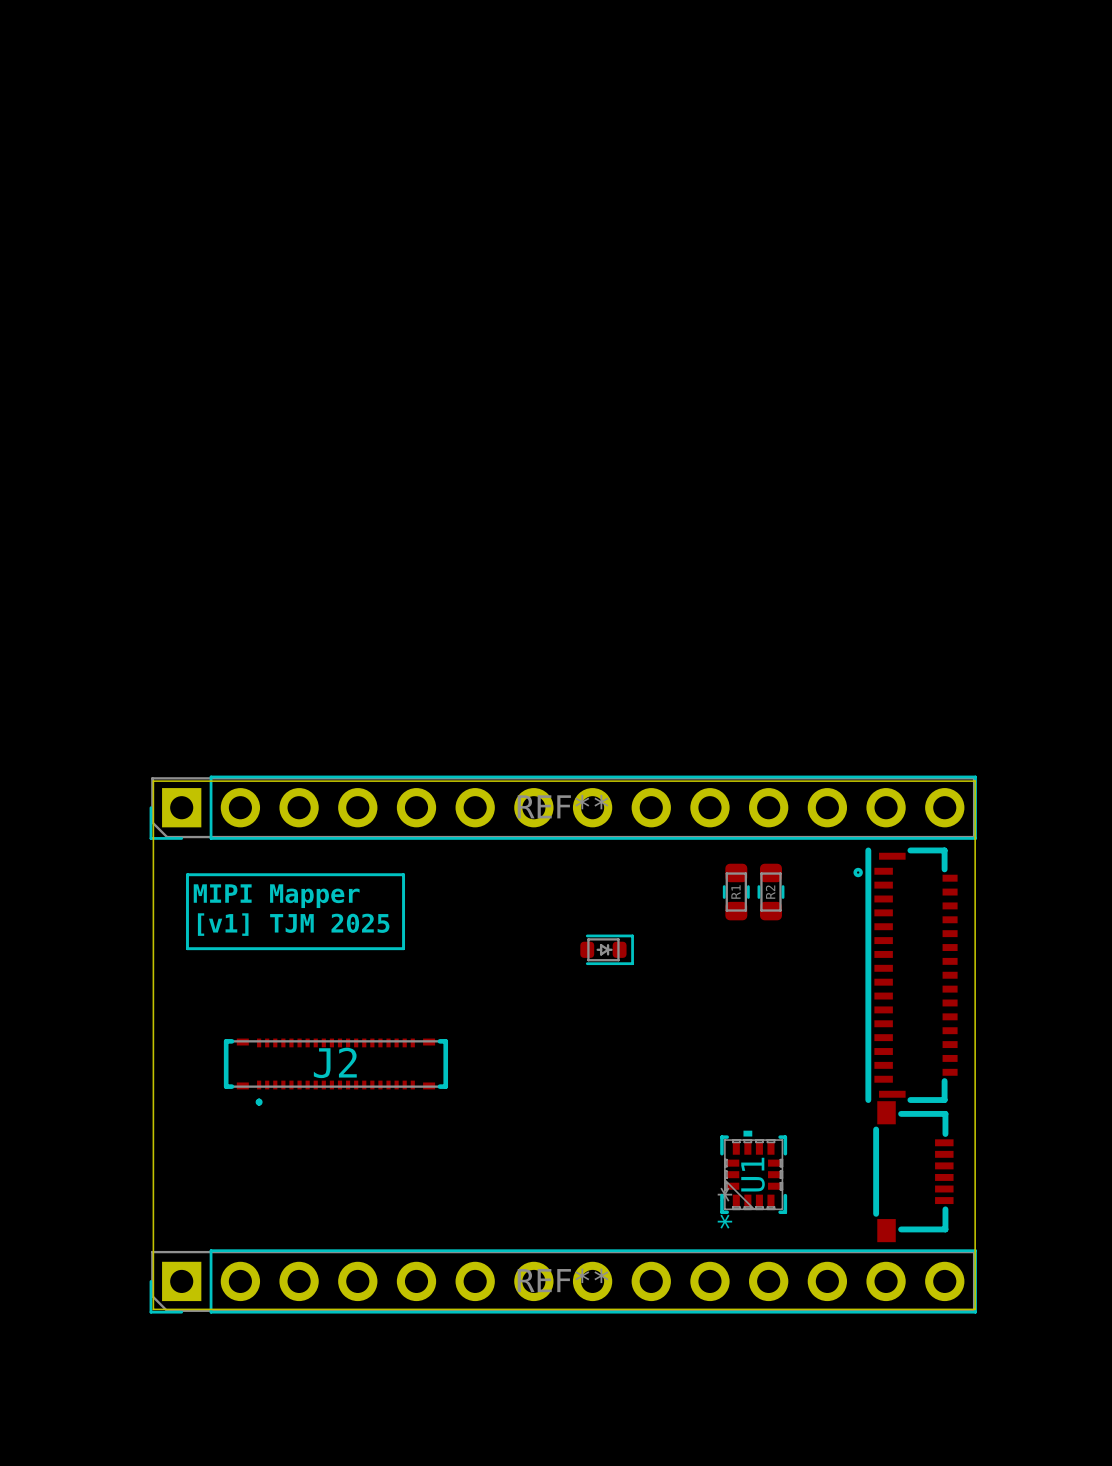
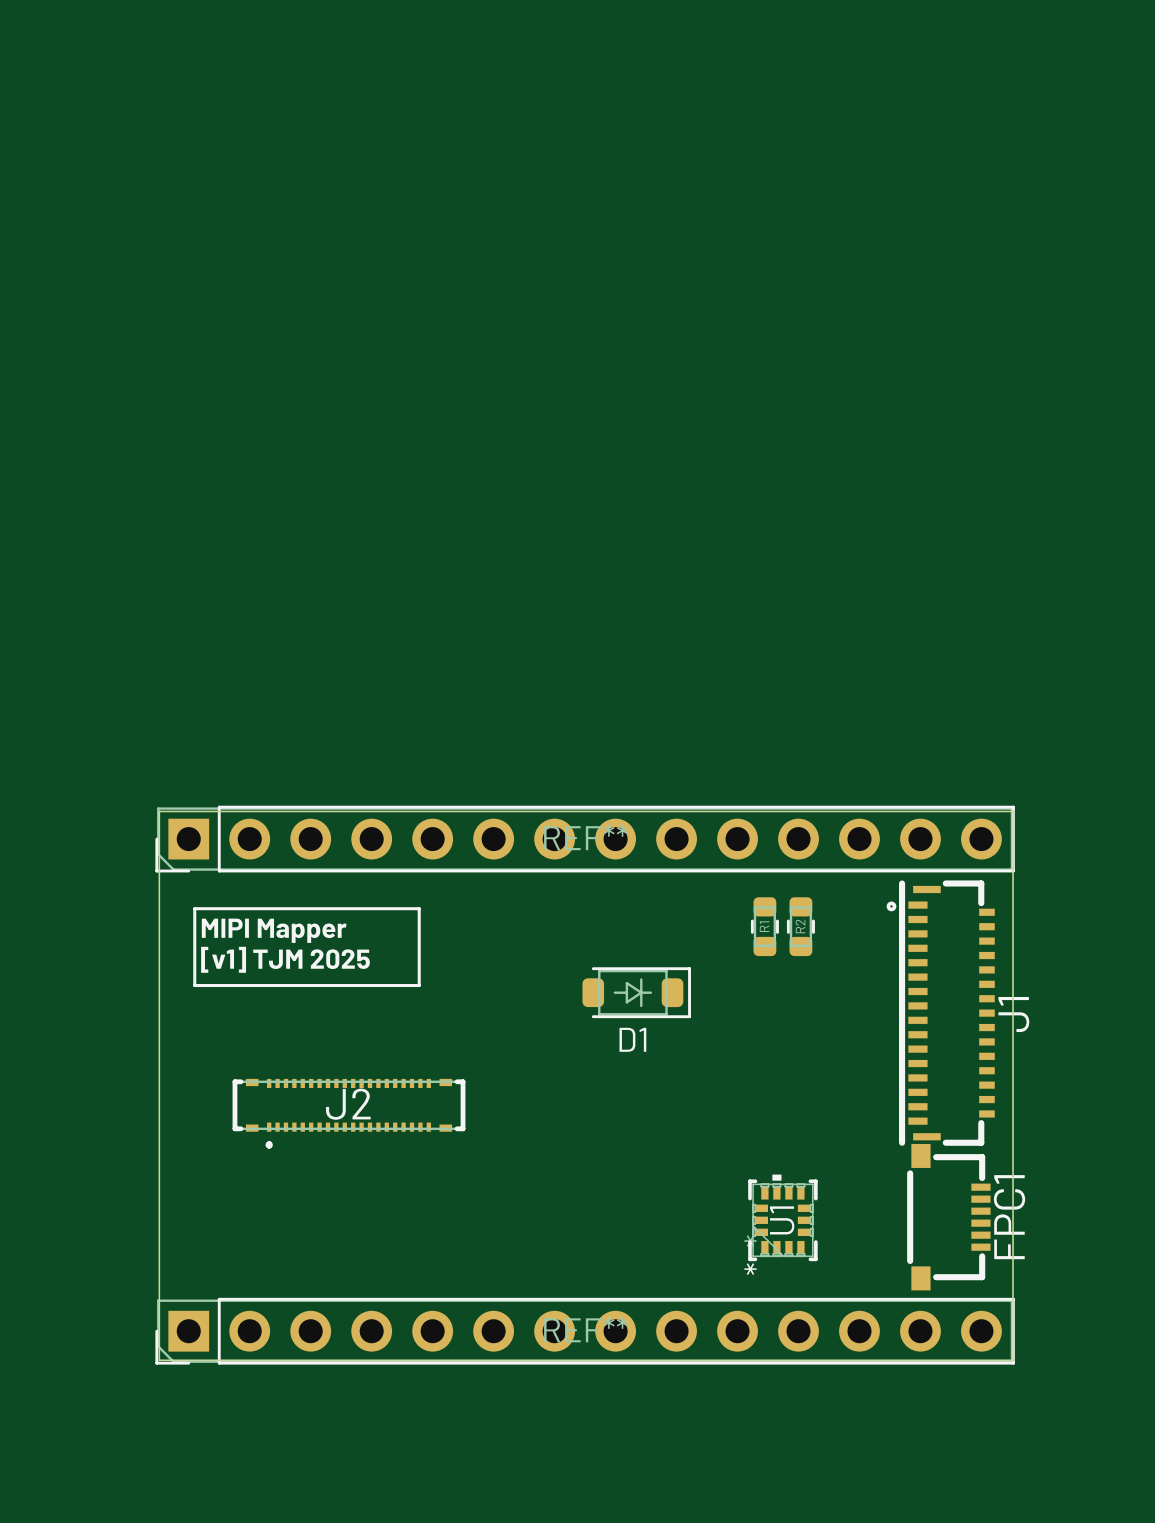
part: (607, 949) -> none
D1: none -> (636, 992)
J1 name: none -> J1 (1013, 1014)
FPC1 name: none -> FPC1 (1009, 1217)

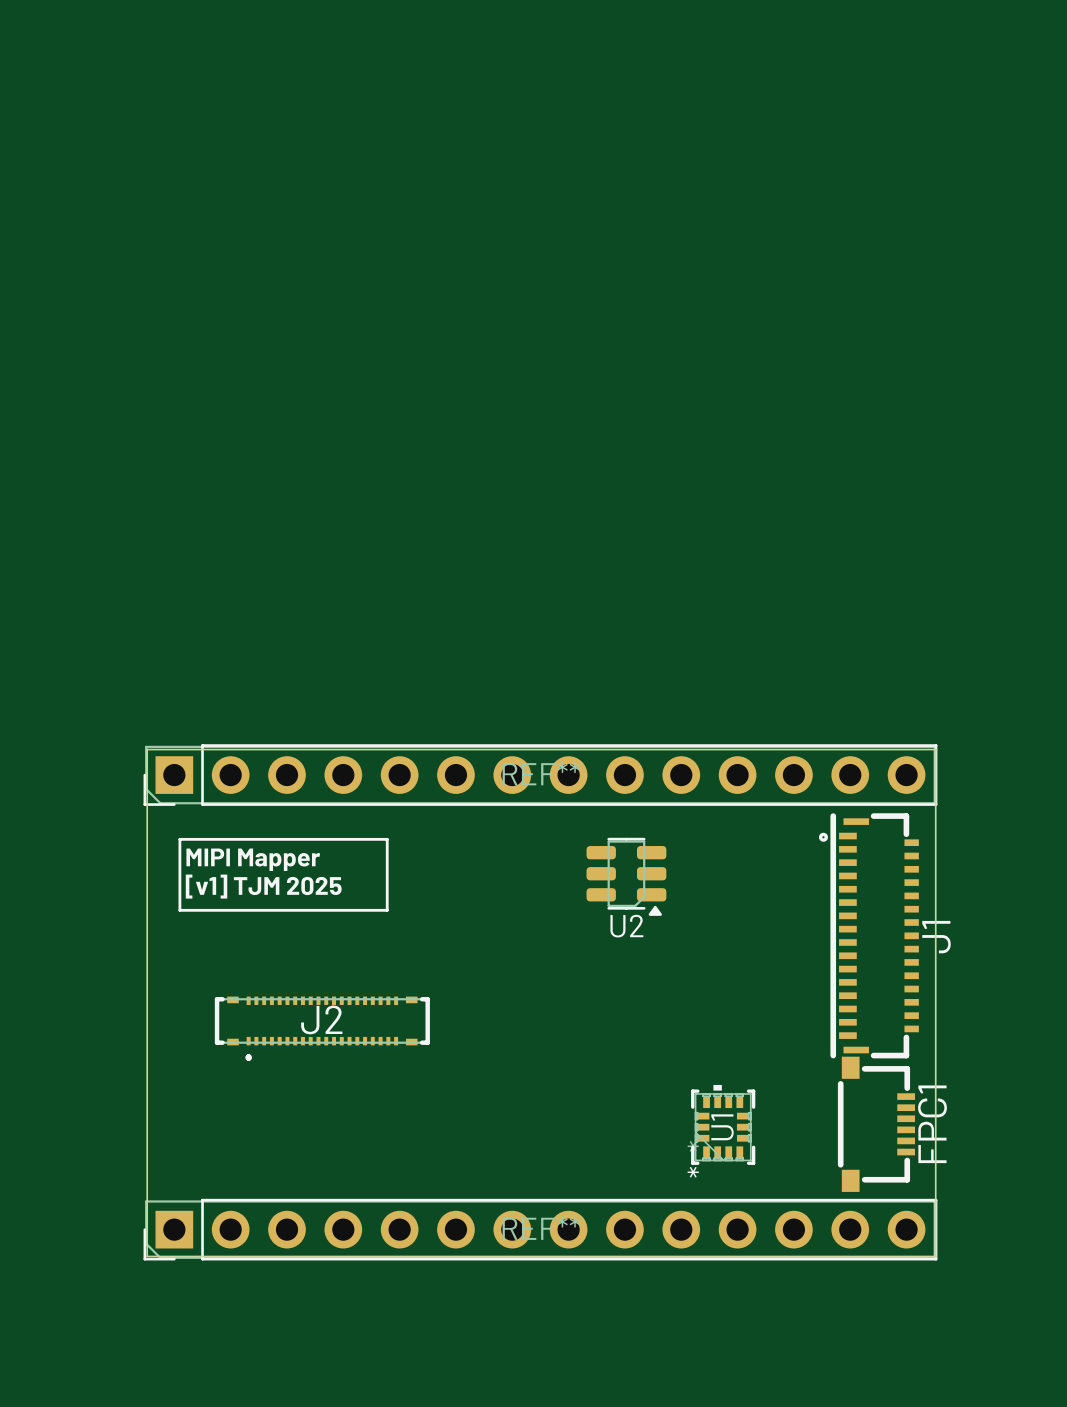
R1: (764, 926) -> none
R2: (800, 926) -> none
U2: none -> (626, 876)
D1: (636, 992) -> none

